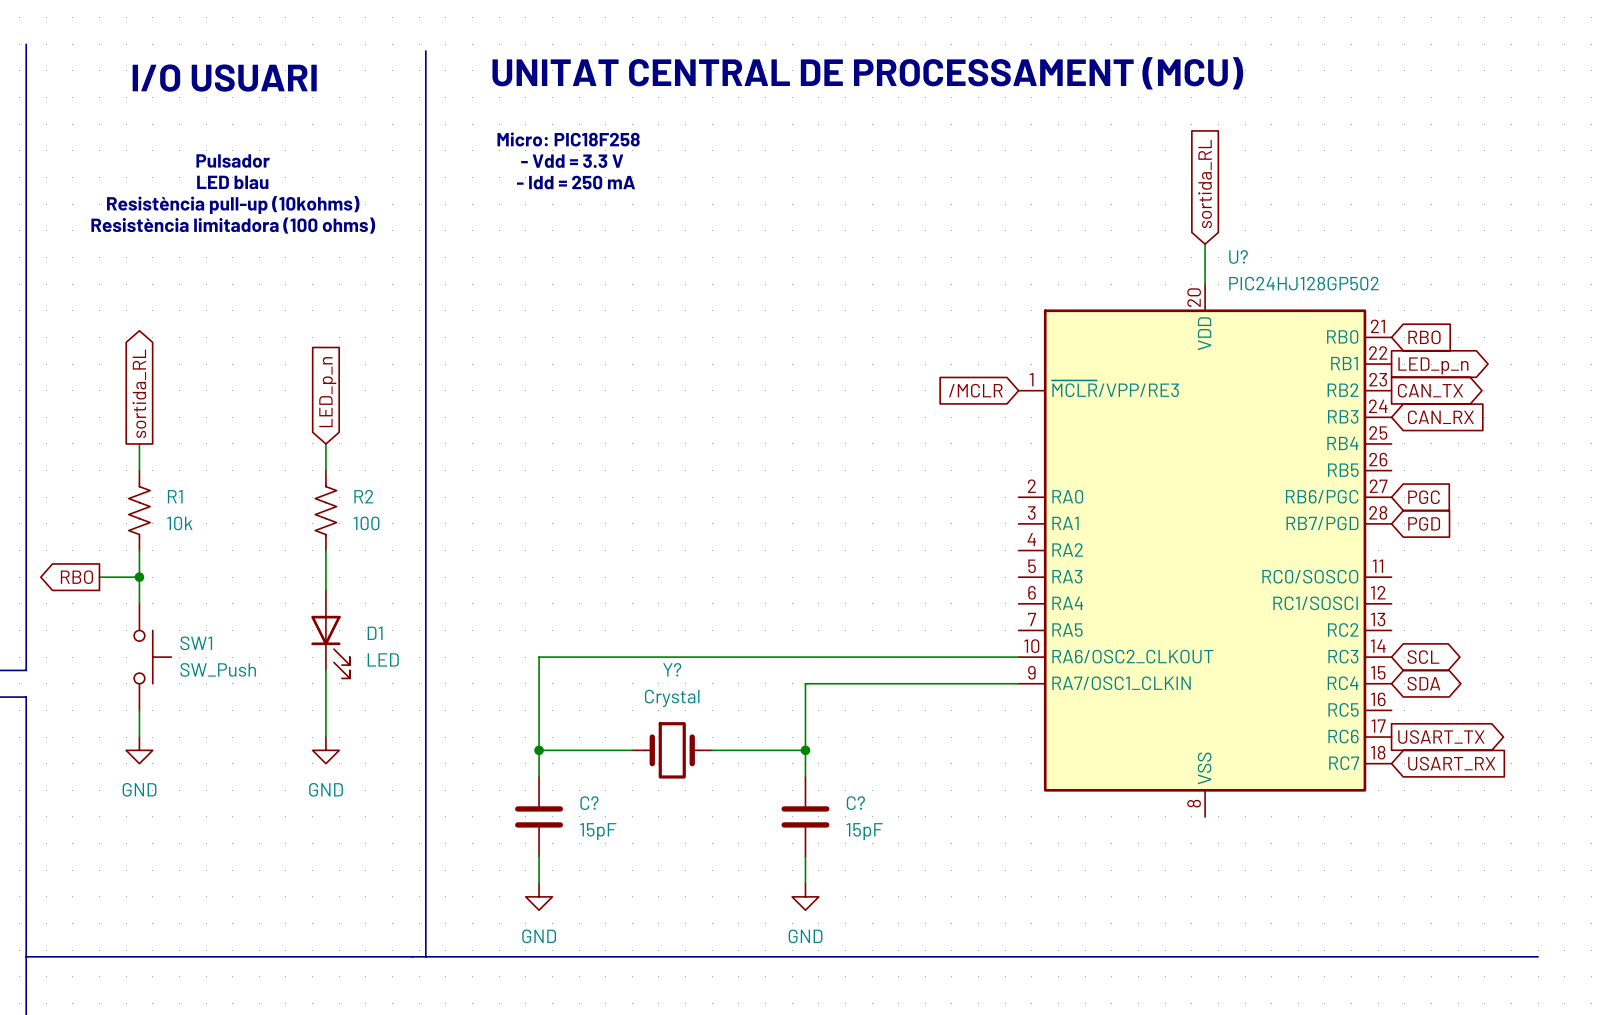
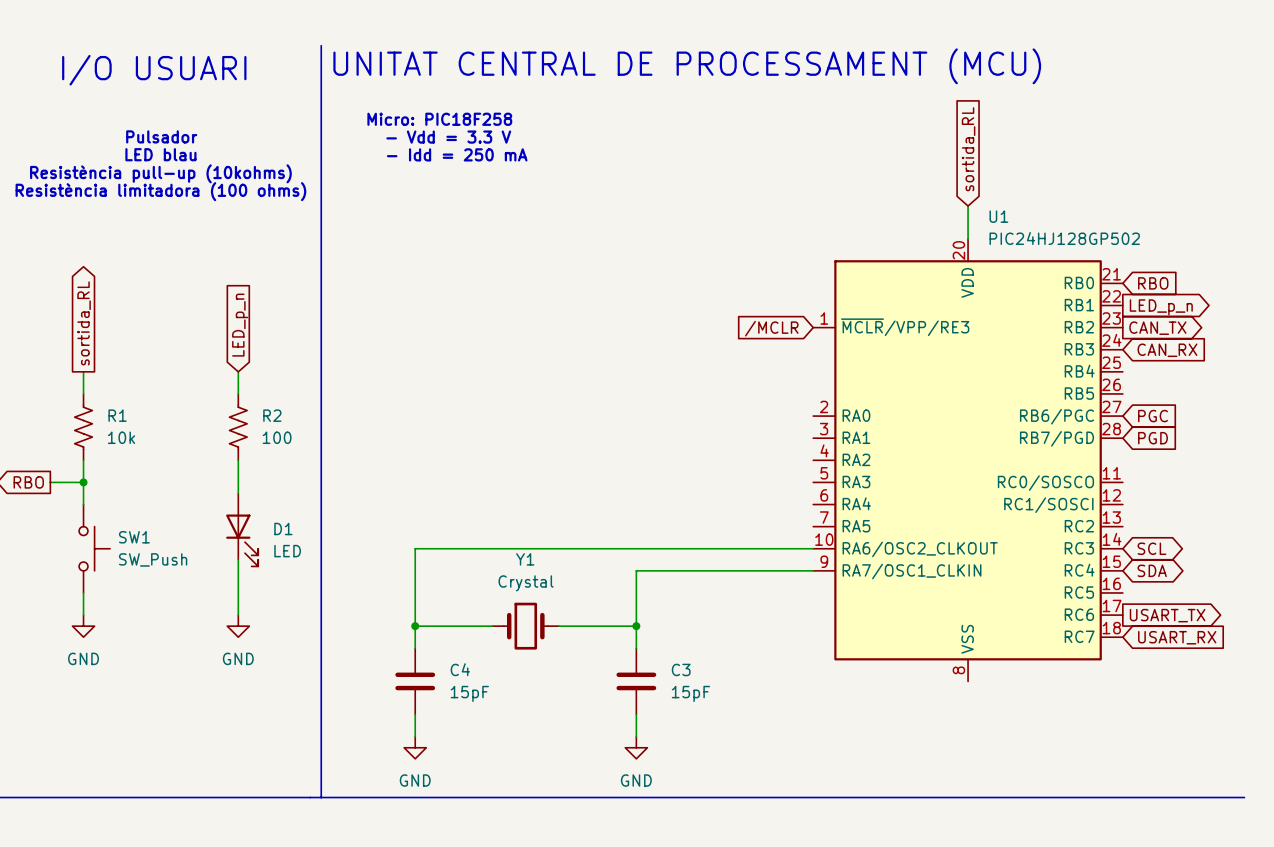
U? name: U? (1238, 256) -> U1 (998, 216)
Y? name: Y? (672, 669) -> Y1 (525, 559)
C? name: C? (589, 803) -> C4 (460, 669)
C? name: C? (855, 803) -> C3 (681, 669)

